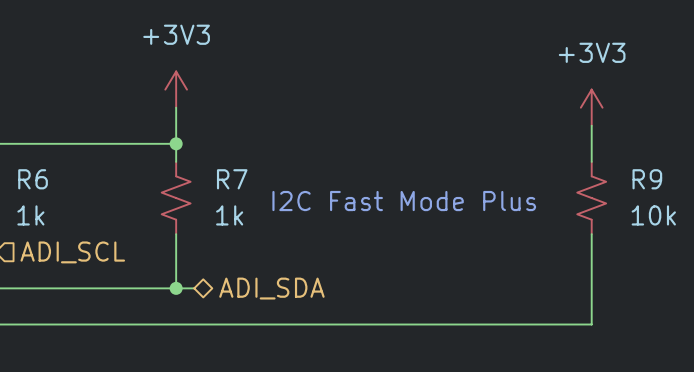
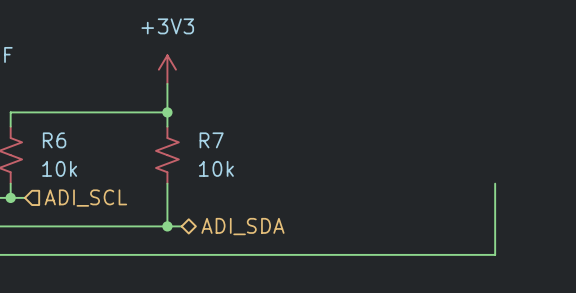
power symbol: +3V3 (591, 107) -> none
wire: (591, 125) (591, 161) -> none
R9: 10k (591, 198) -> none
text: I2C Fast Mode Plus (404, 201) -> none
R6 value: 1k (30, 215) -> 10k (59, 168)
R7 value: 1k (229, 215) -> 10k (216, 168)

